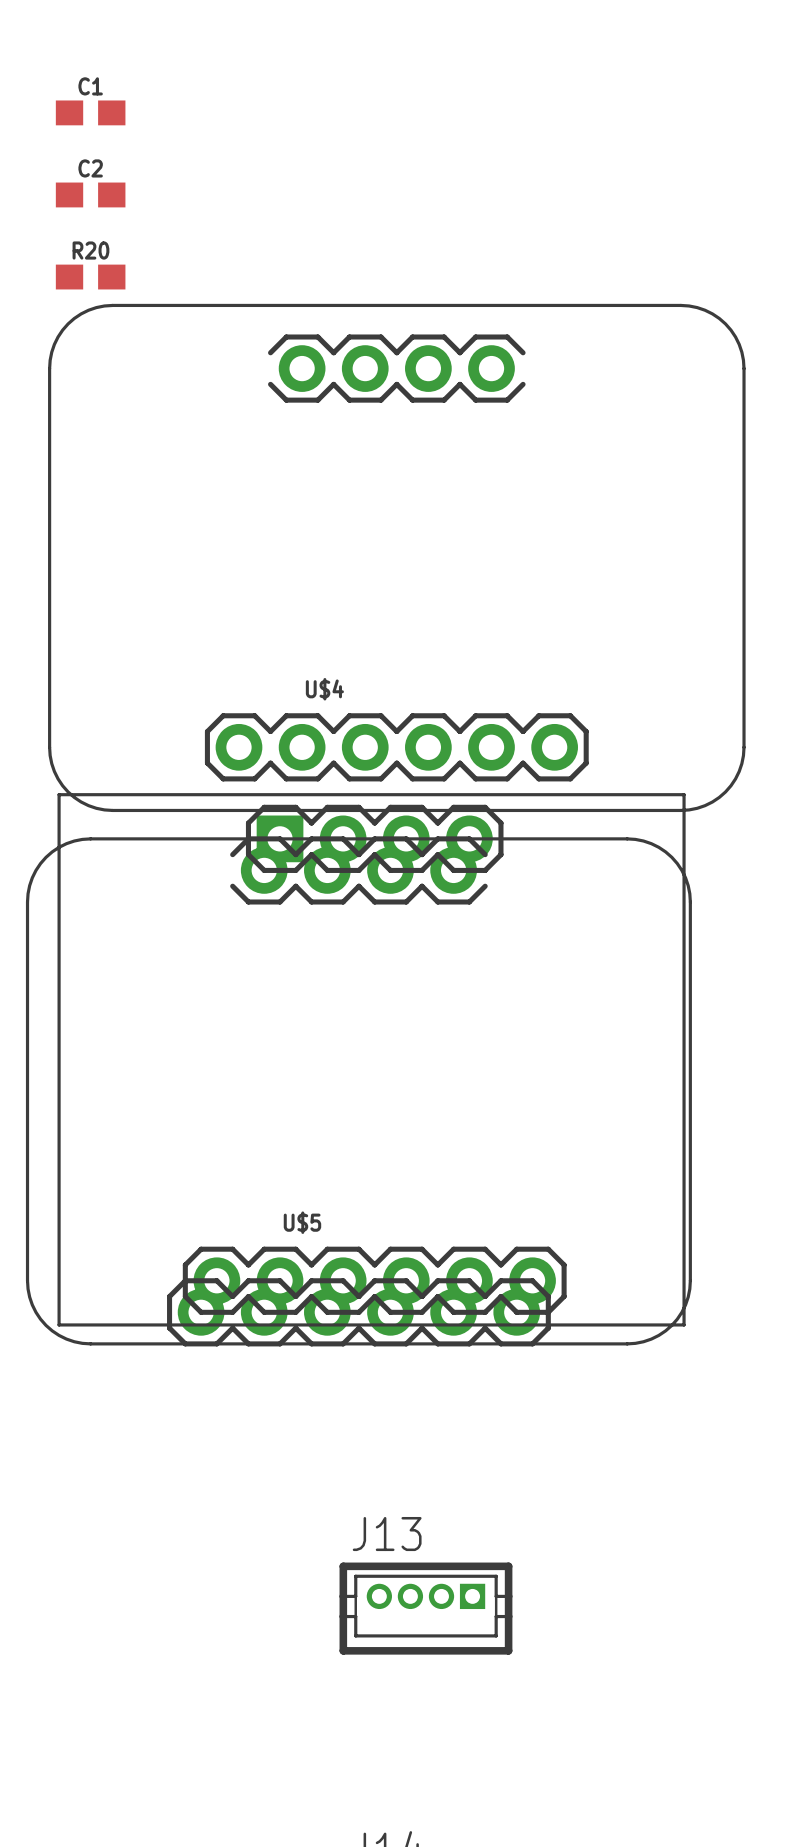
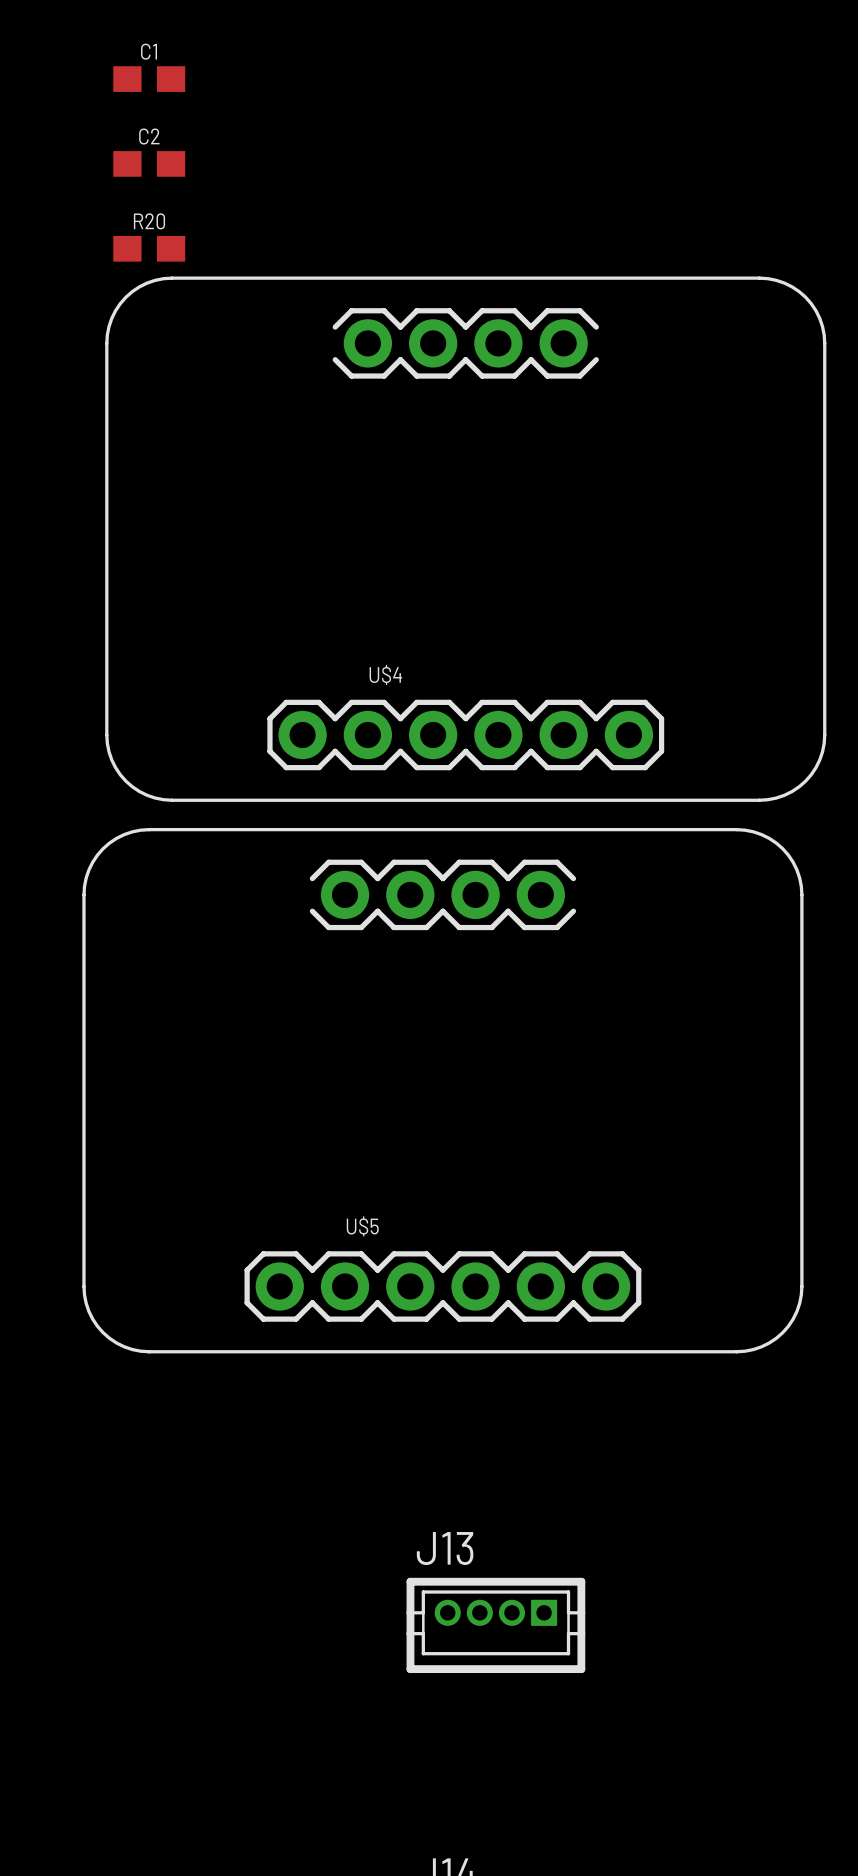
U$5 footprint: [25, 836, 692, 1347] -> [82, 828, 804, 1354]
part: (371, 1059) -> none

